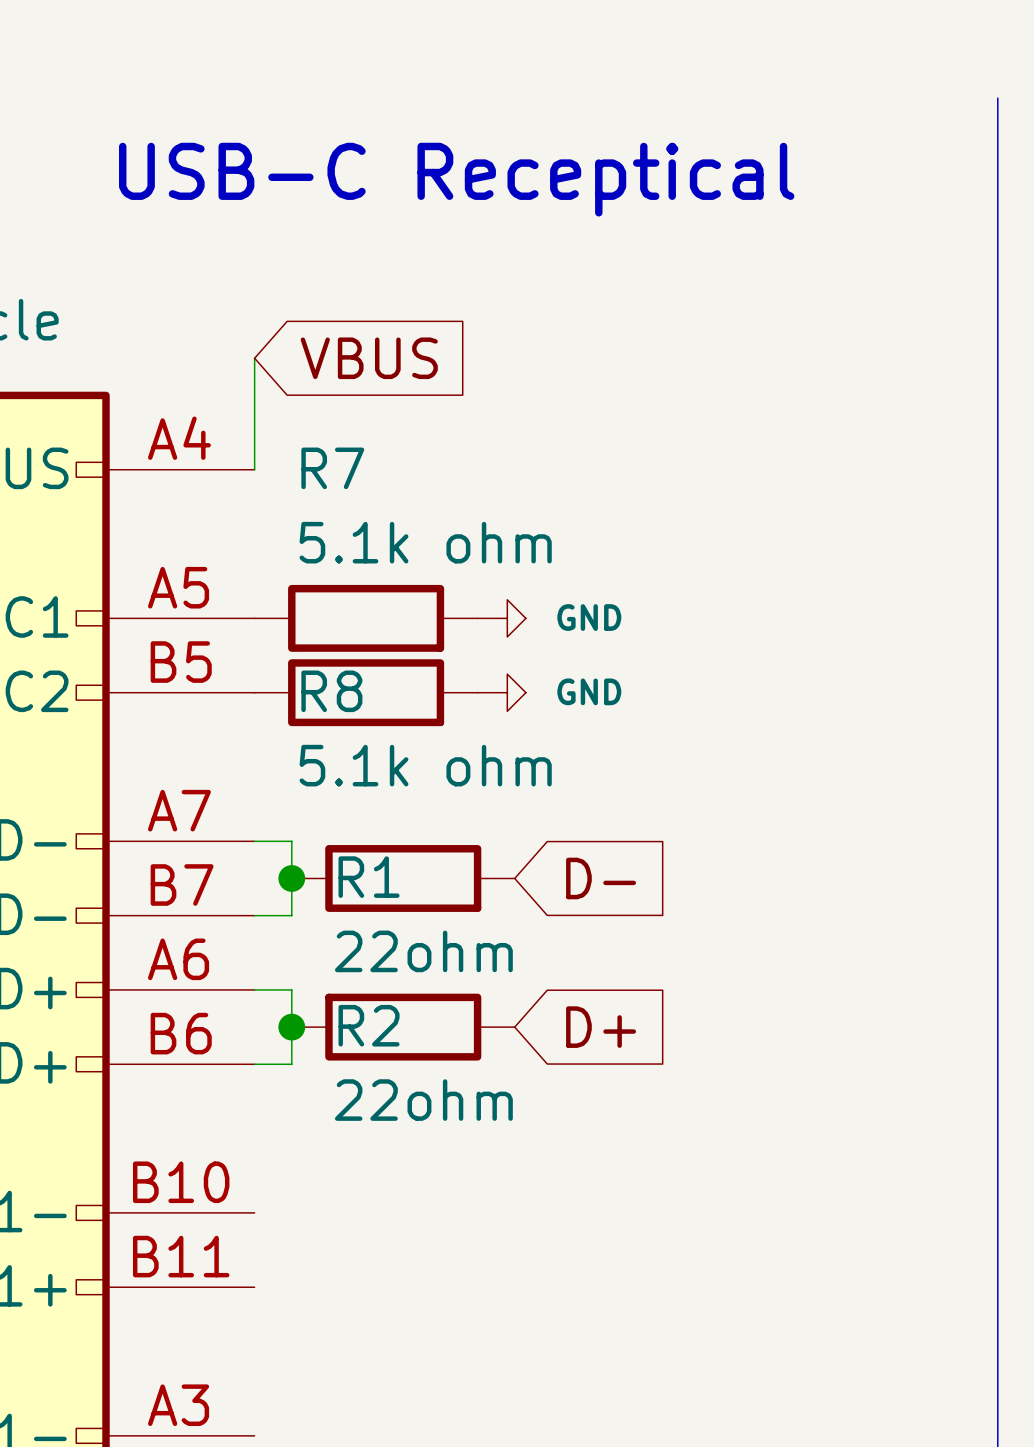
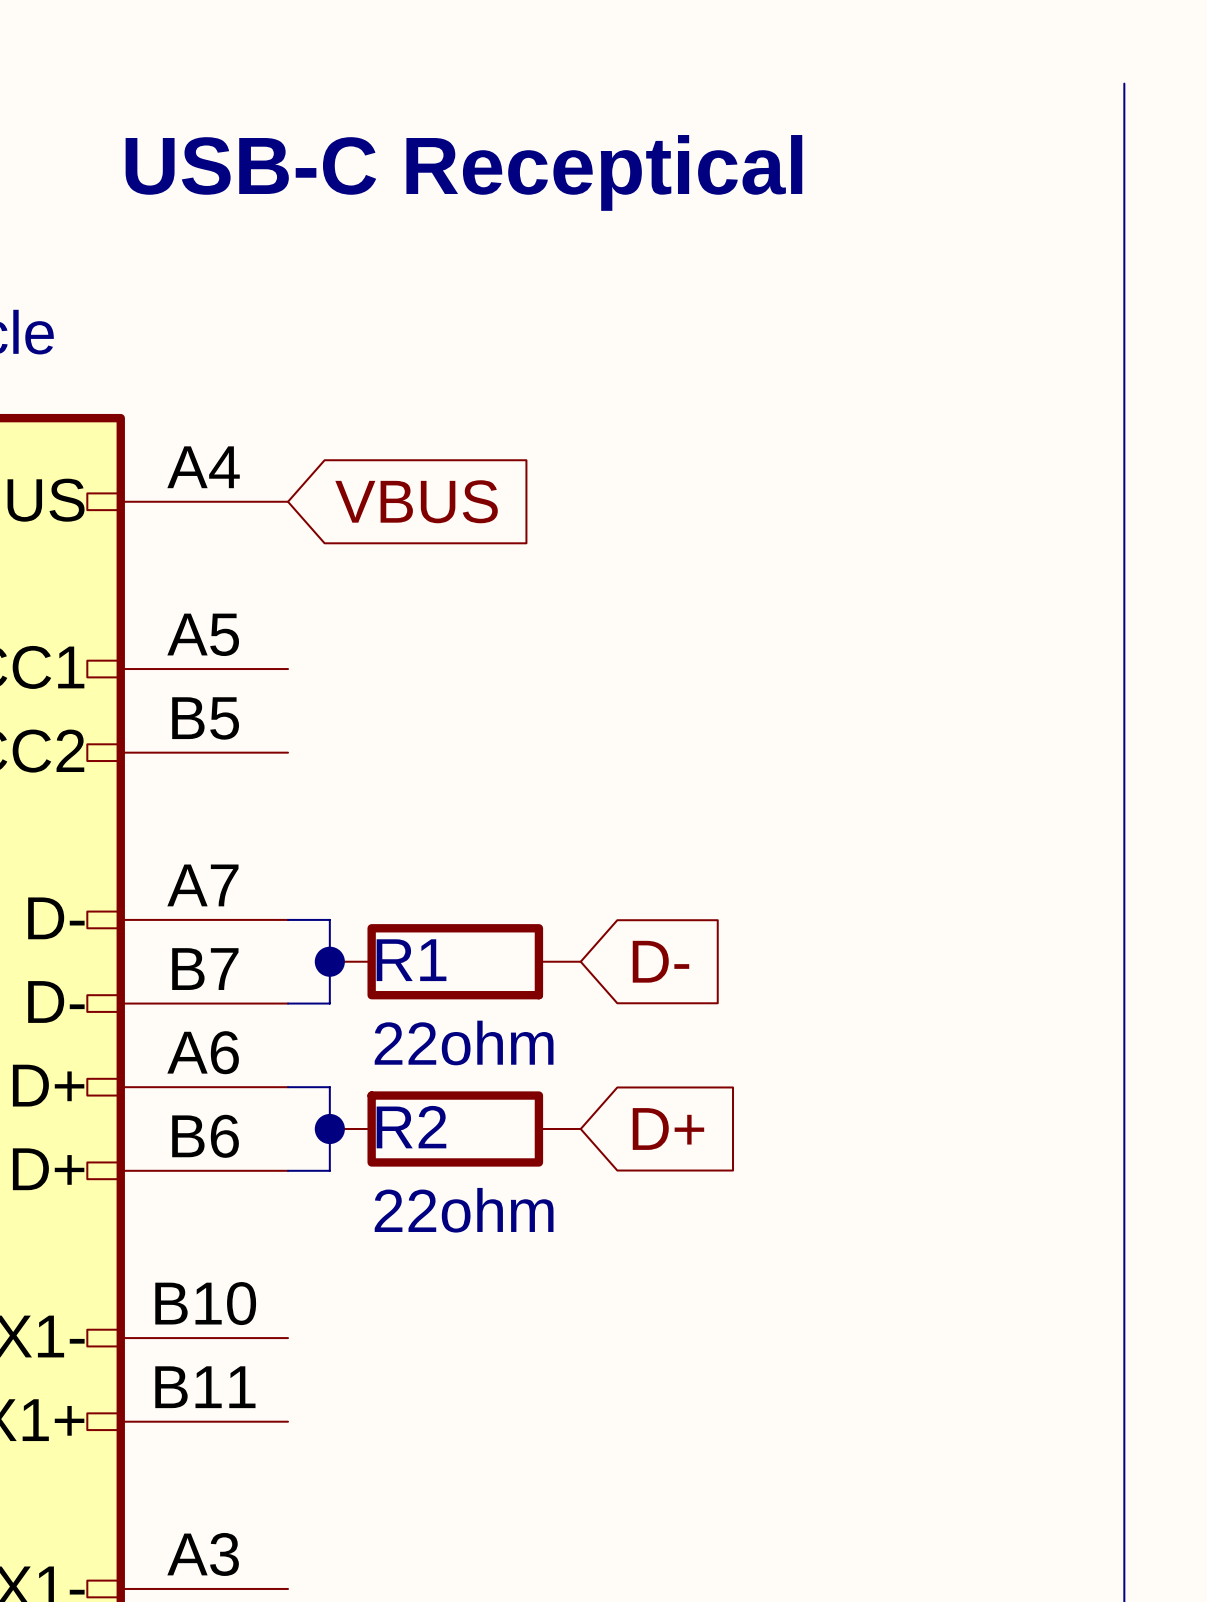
wire: (254, 358) (254, 469) -> none
global label position: VBUS (369, 358) -> VBUS (416, 501)
R7: 5.1k ohm (366, 618) -> none
power symbol: GND (501, 618) -> none
R8: 5.1k ohm (366, 692) -> none
power symbol: GND (501, 692) -> none

